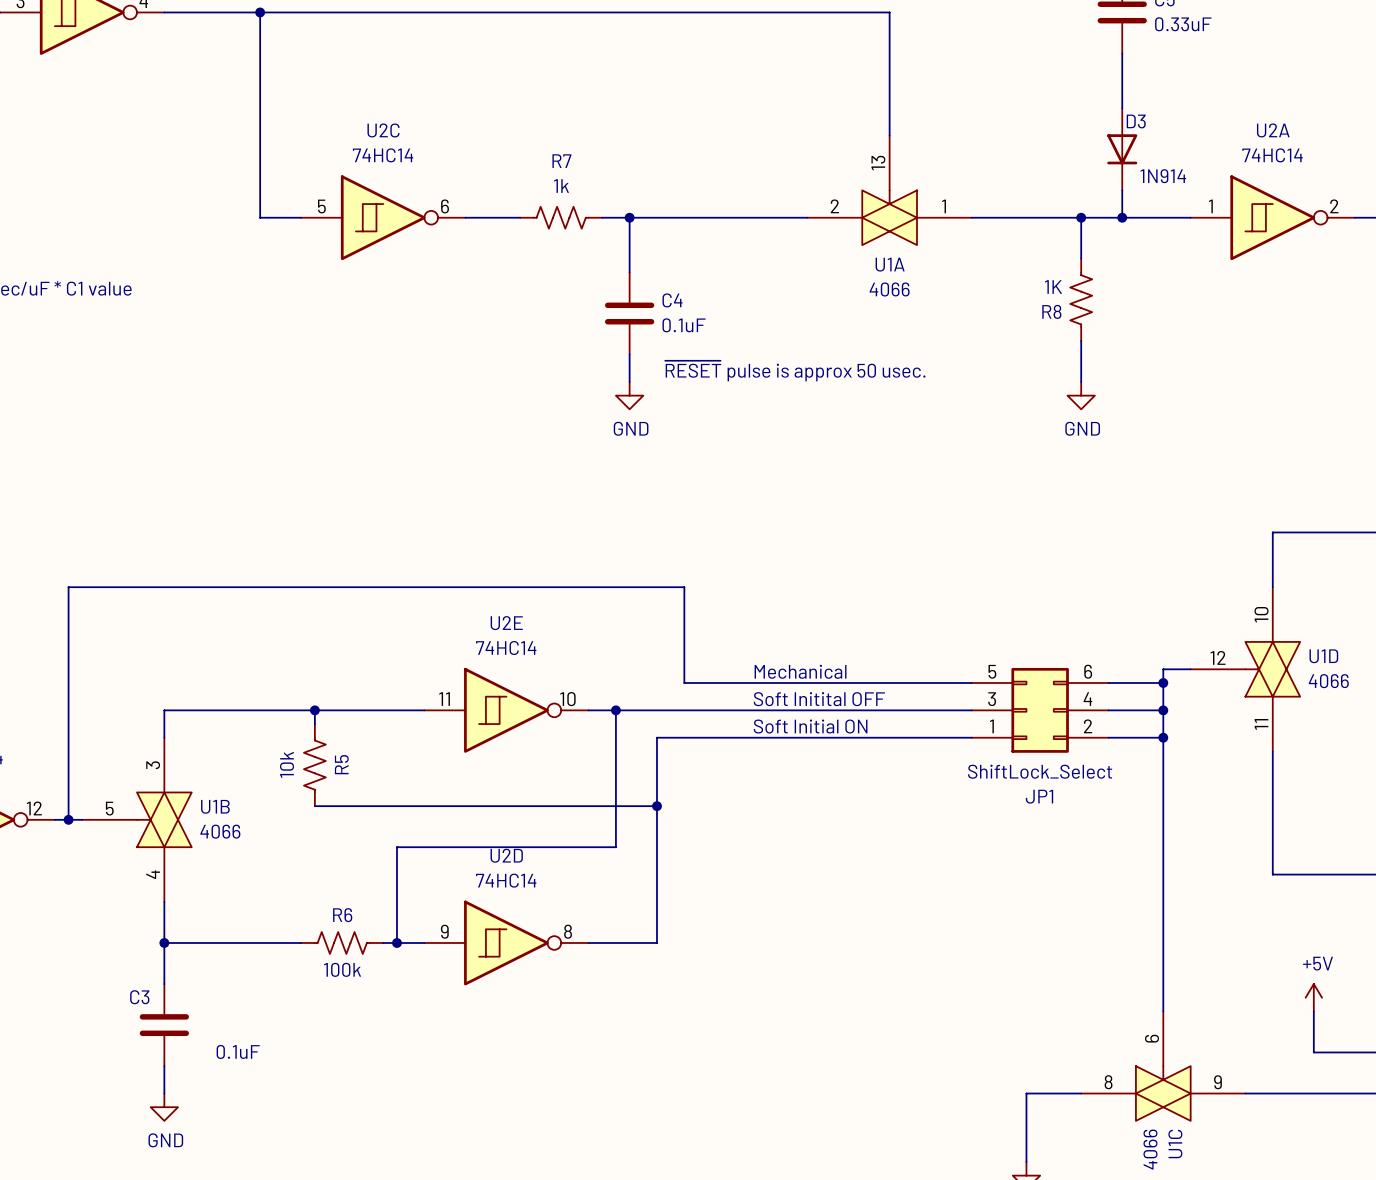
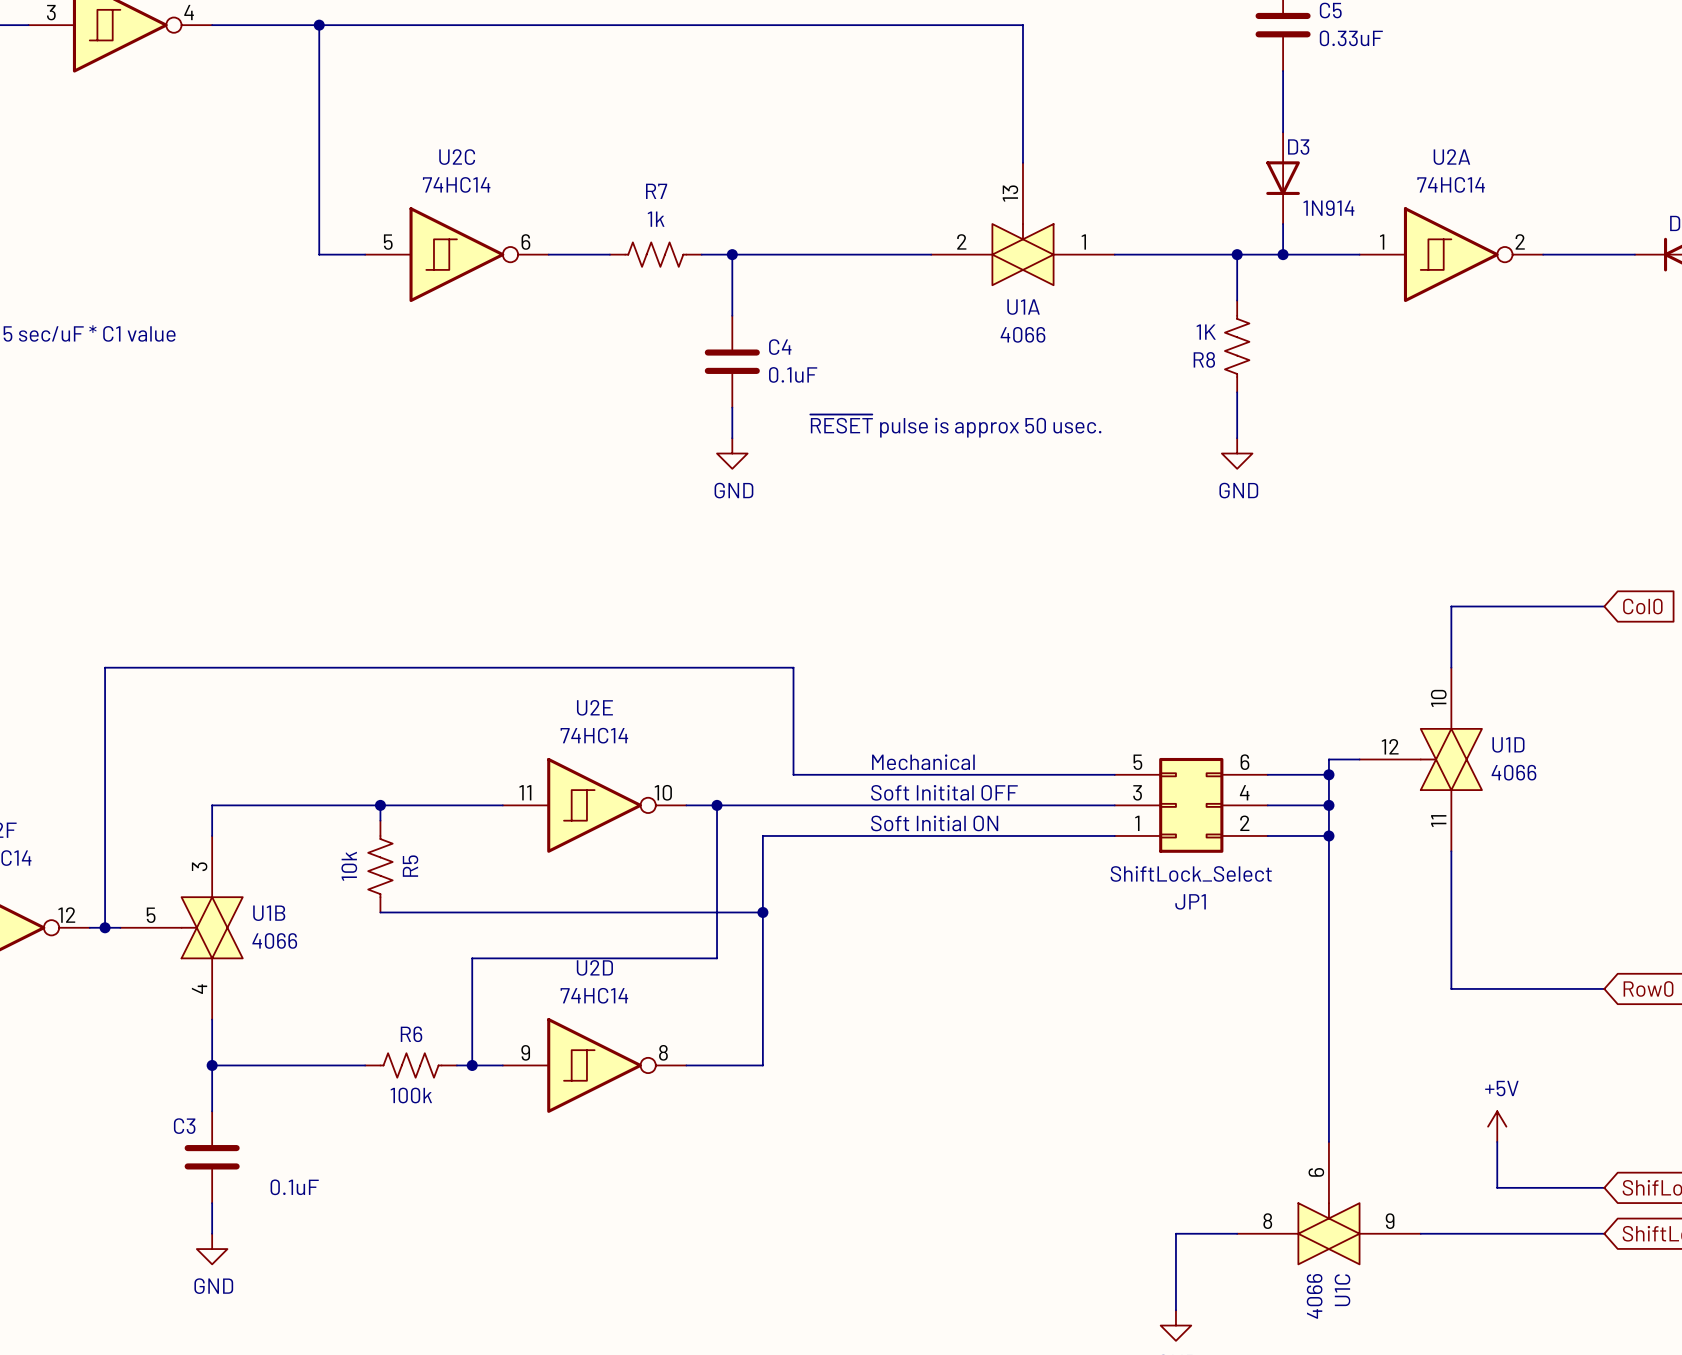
text position: ~{RESET} pulse is approx 50 usec. (795, 371) -> ~{RESET} pulse is approx 50 usec. (955, 426)

